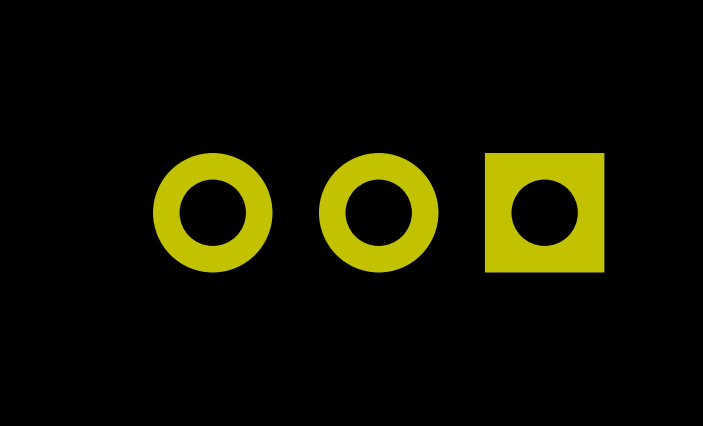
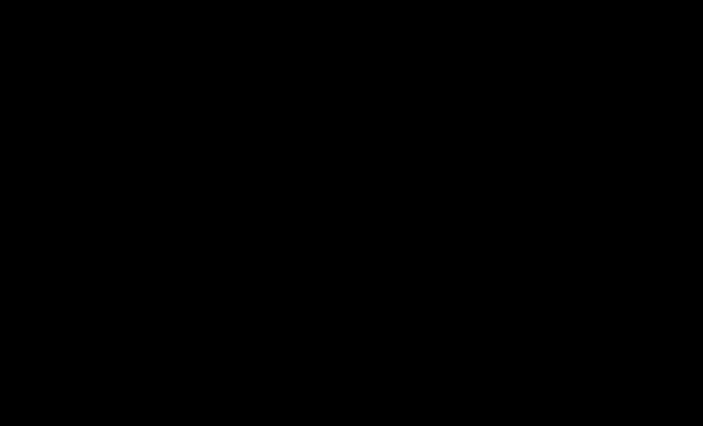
part: (378, 212) -> none

